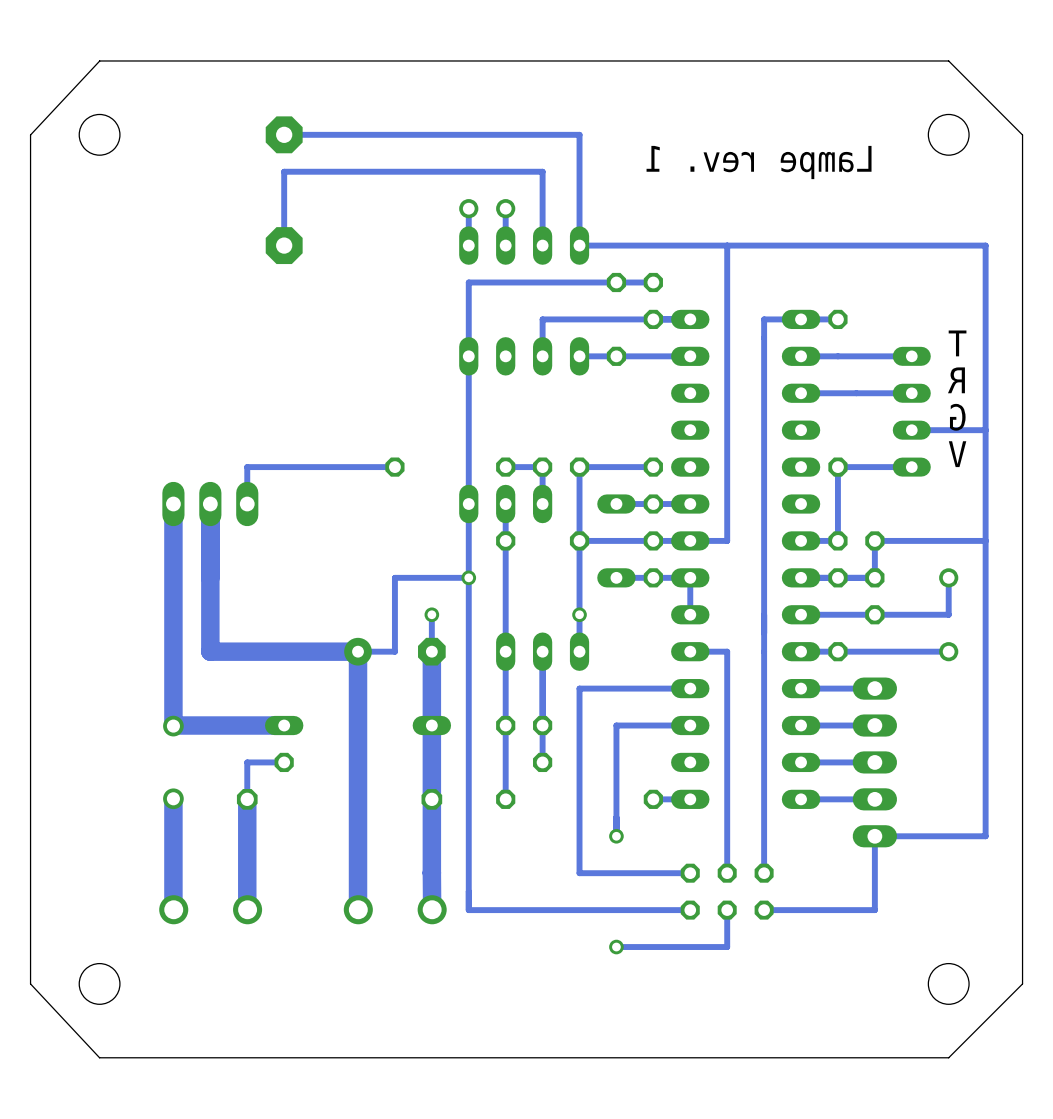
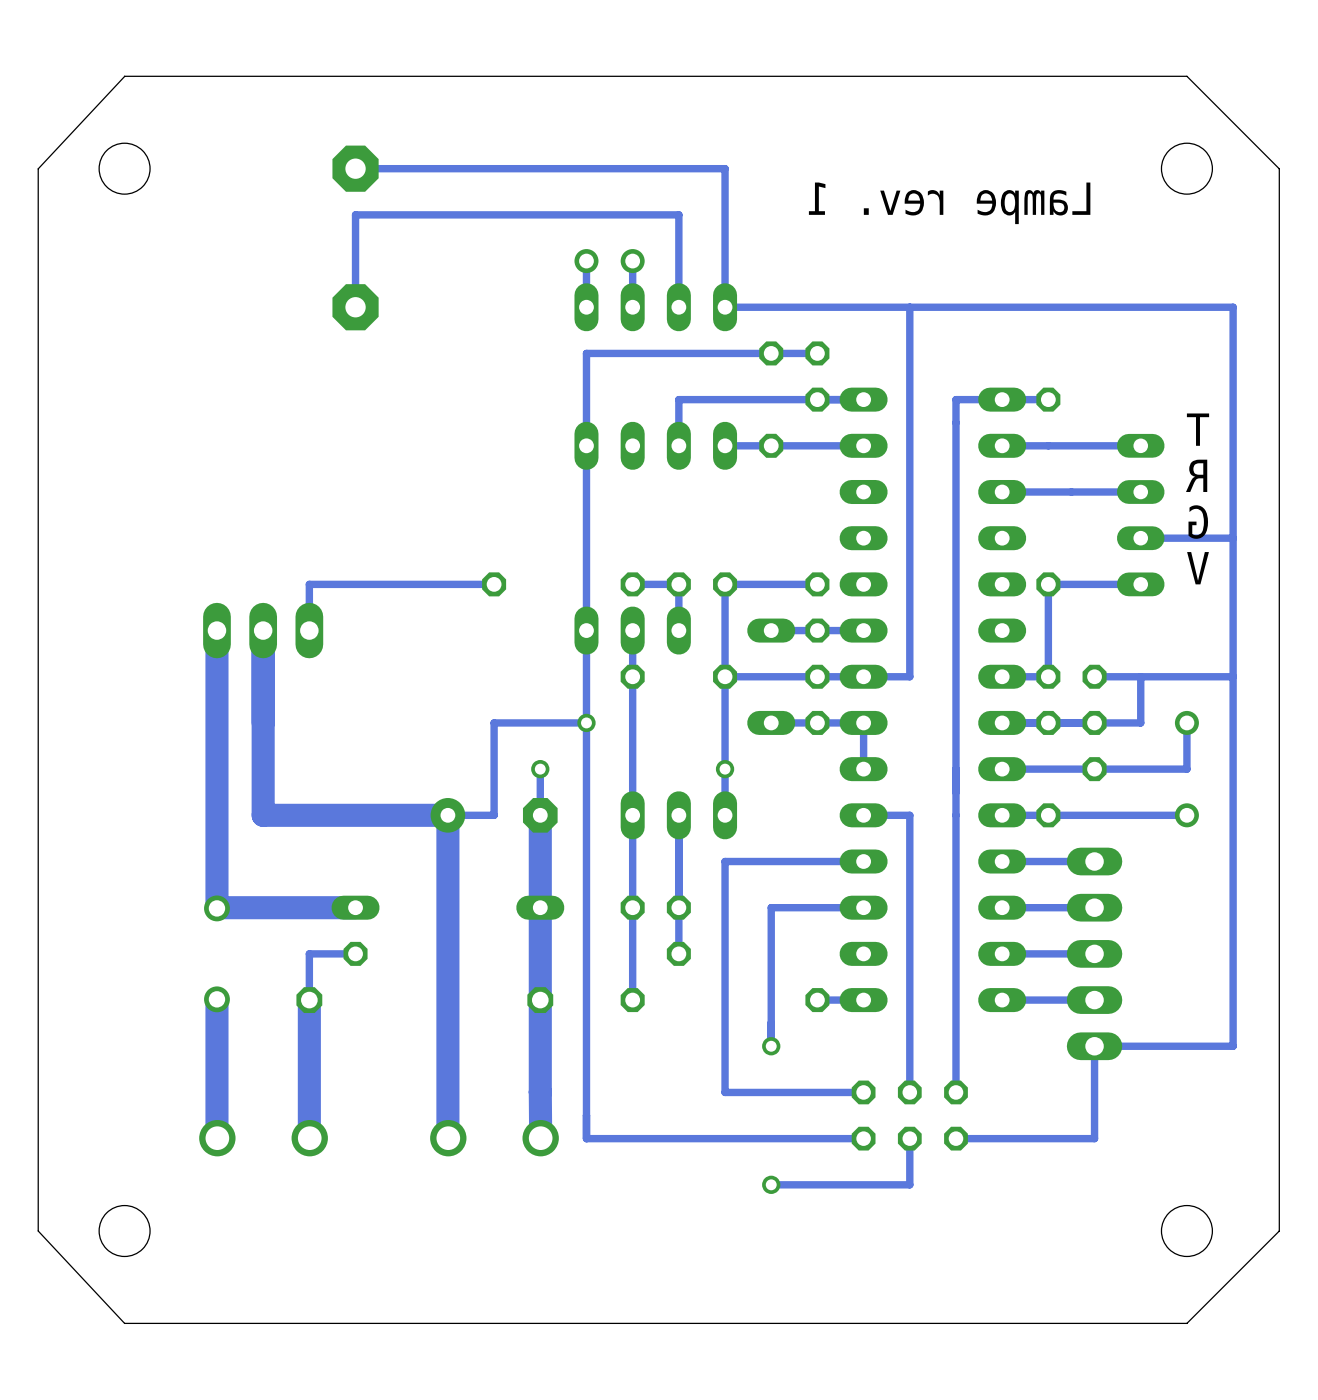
track: (874, 540) (874, 577) -> (1140, 676) (1140, 722) (1094, 722)

